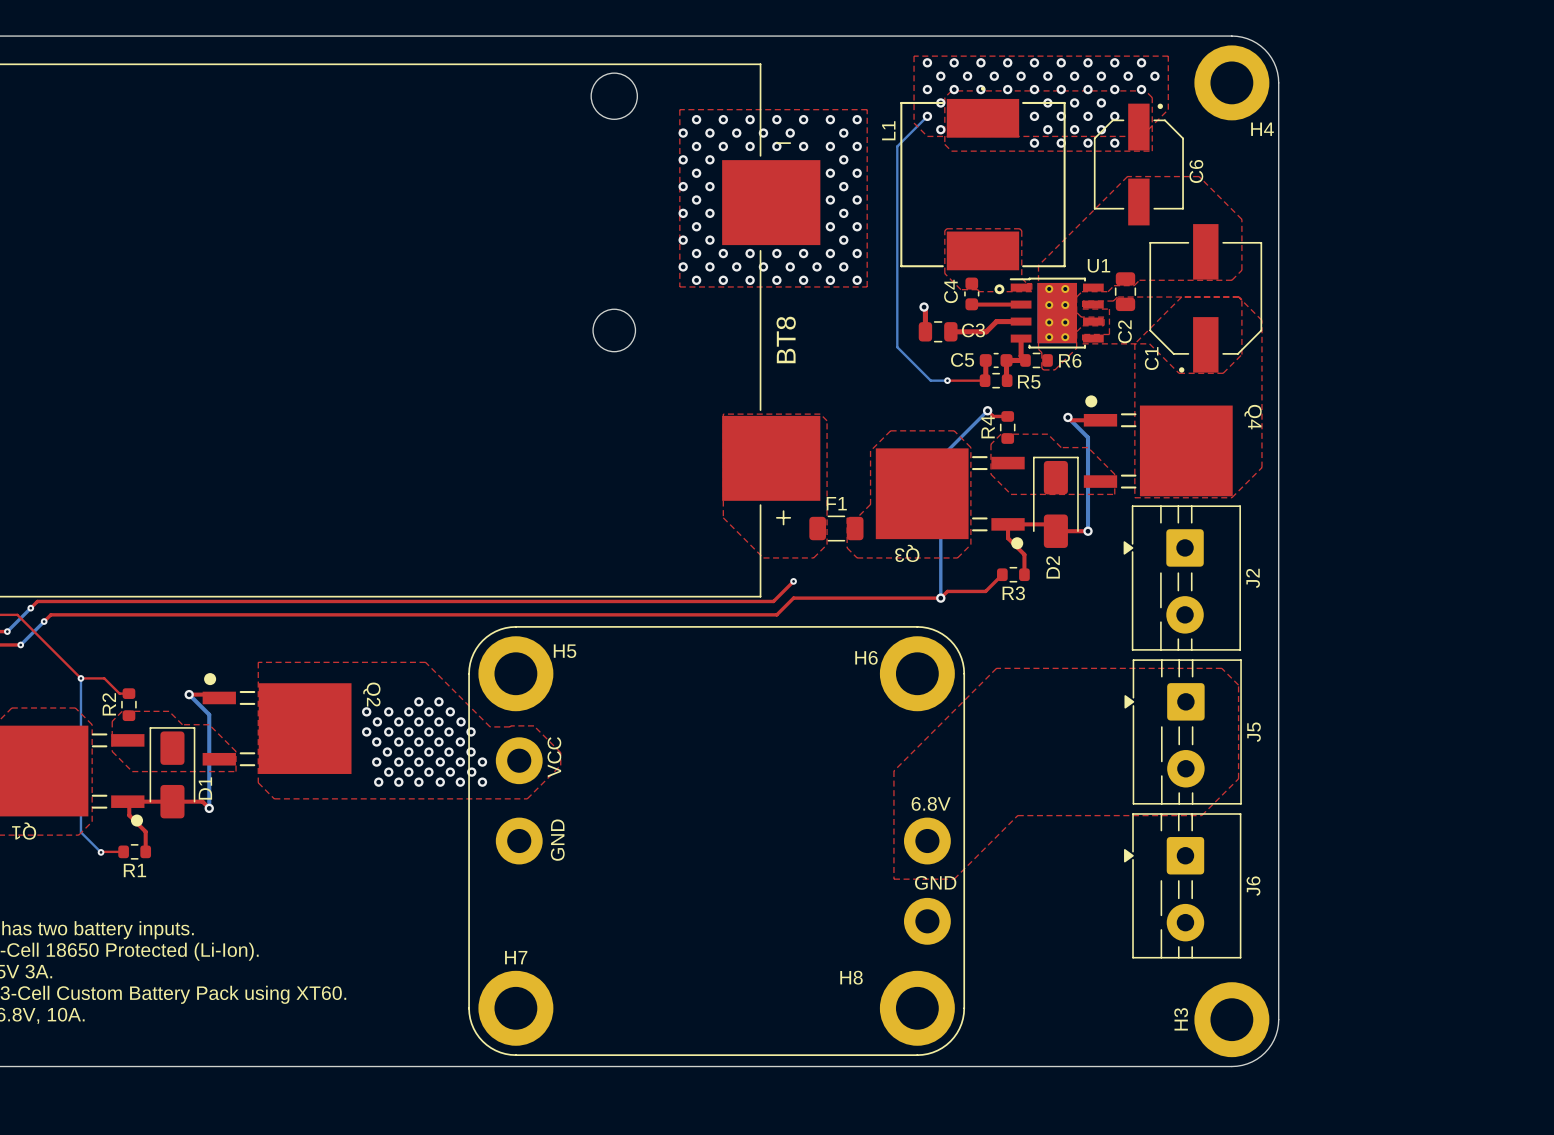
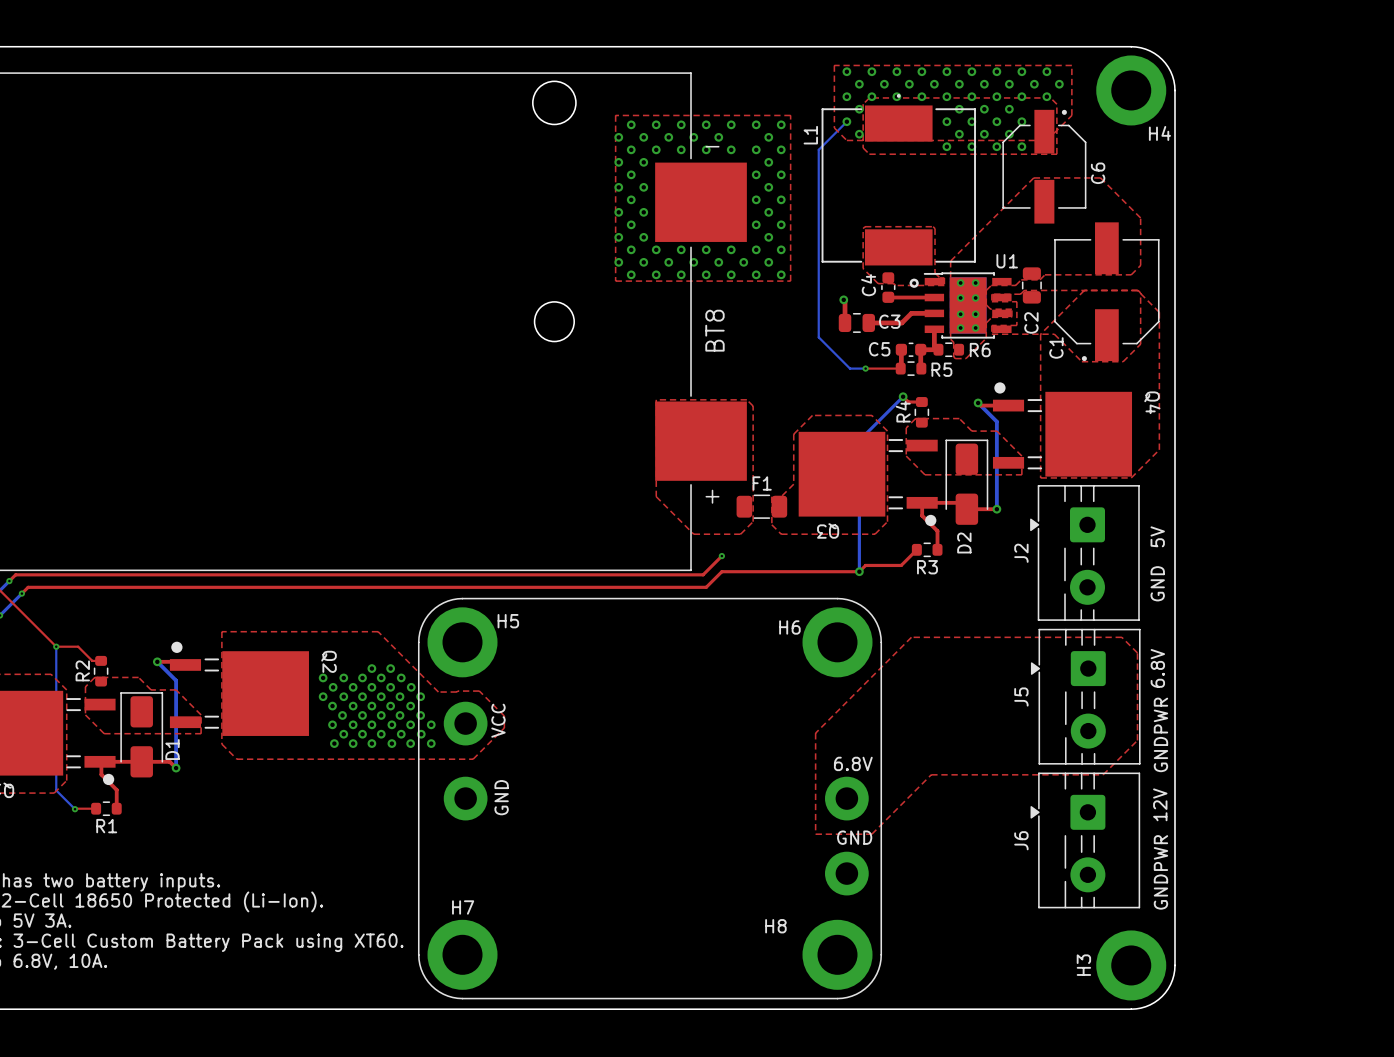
text: none -> 5V (1157, 536)
J2 name position: J2 (1253, 578) -> J2 (1021, 553)
text: none -> GND (1157, 583)
text: none -> 6.8V (1157, 668)
J5 name position: J5 (1254, 732) -> J5 (1021, 697)
text: none -> GNDPWR (1160, 734)
text: none -> 12V (1160, 804)
J6 name position: J6 (1253, 886) -> J6 (1021, 840)
text: none -> GNDPWR (1160, 872)

